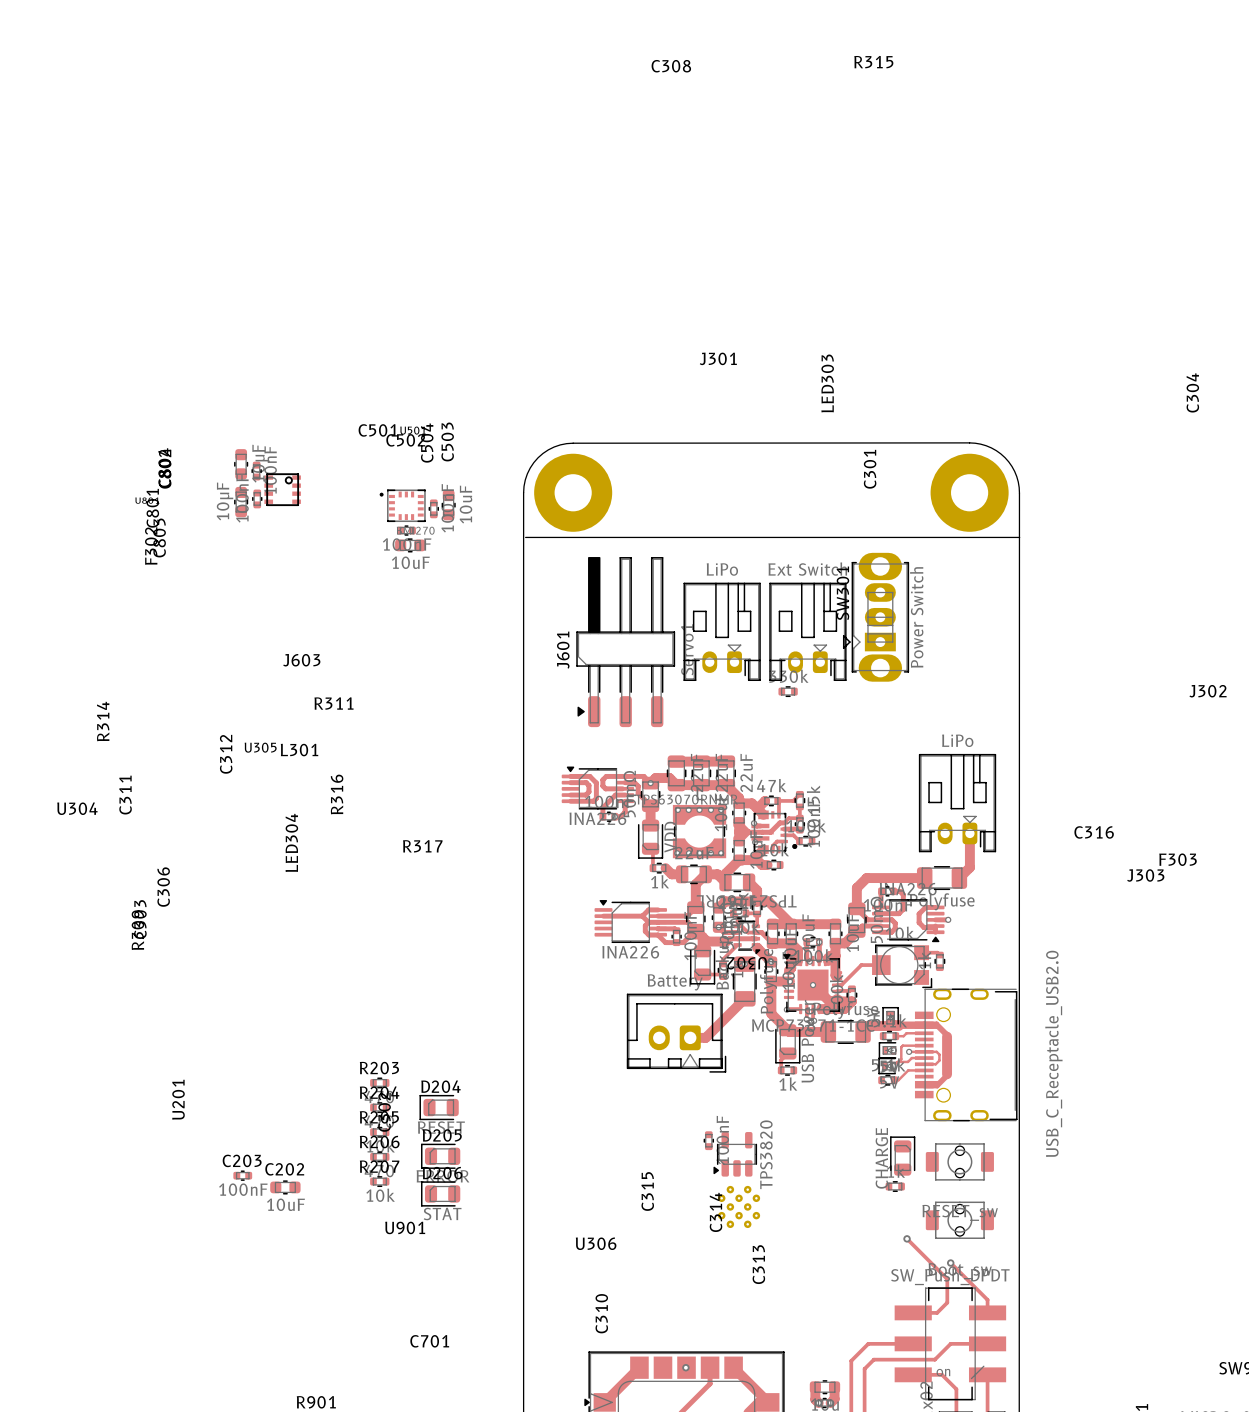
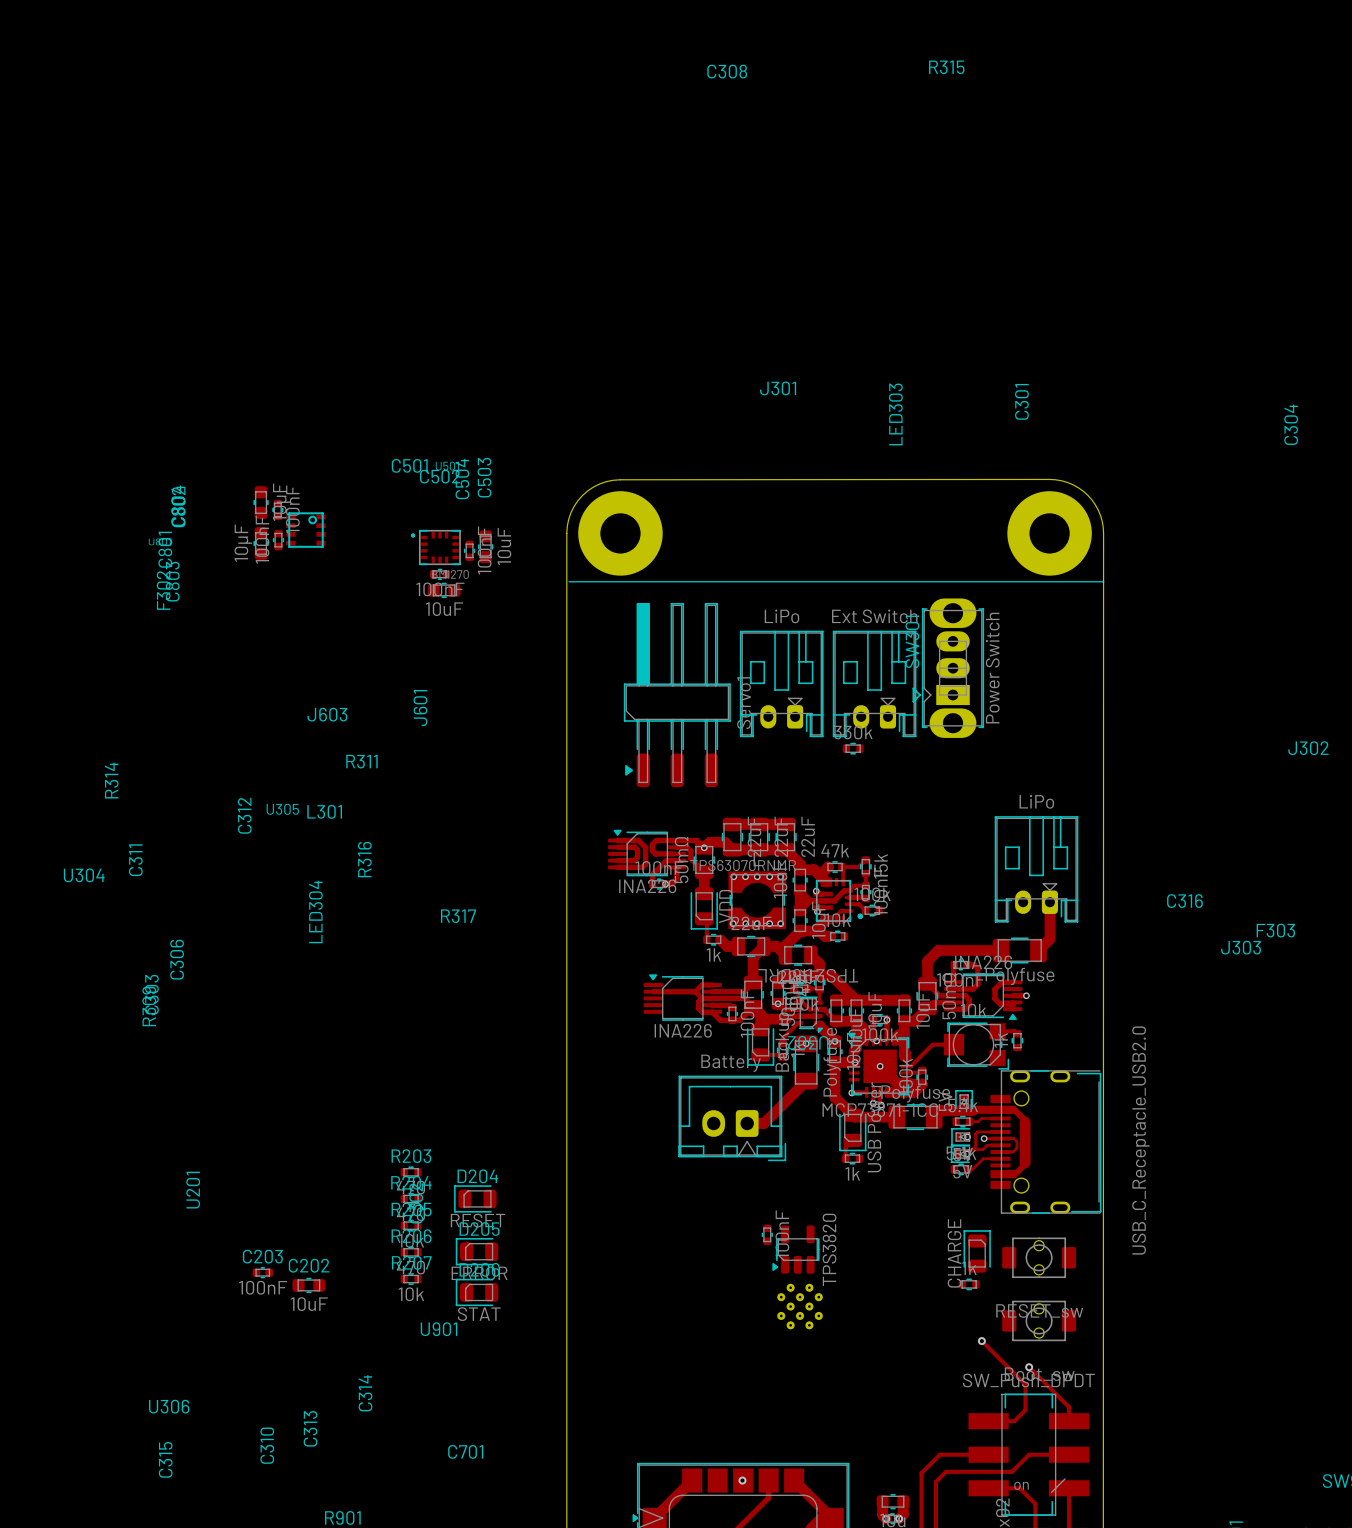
C301 name position: C301 (870, 469) -> C301 (1021, 401)
J601 name position: J601 (563, 650) -> J601 (420, 708)
C315 name position: C315 (647, 1191) -> C315 (165, 1459)
C314 name position: C314 (715, 1212) -> C314 (365, 1393)
U306 name position: U306 (596, 1243) -> U306 (169, 1406)
C313 name position: C313 (758, 1264) -> C313 (310, 1428)
C310 name position: C310 (601, 1313) -> C310 (267, 1445)

